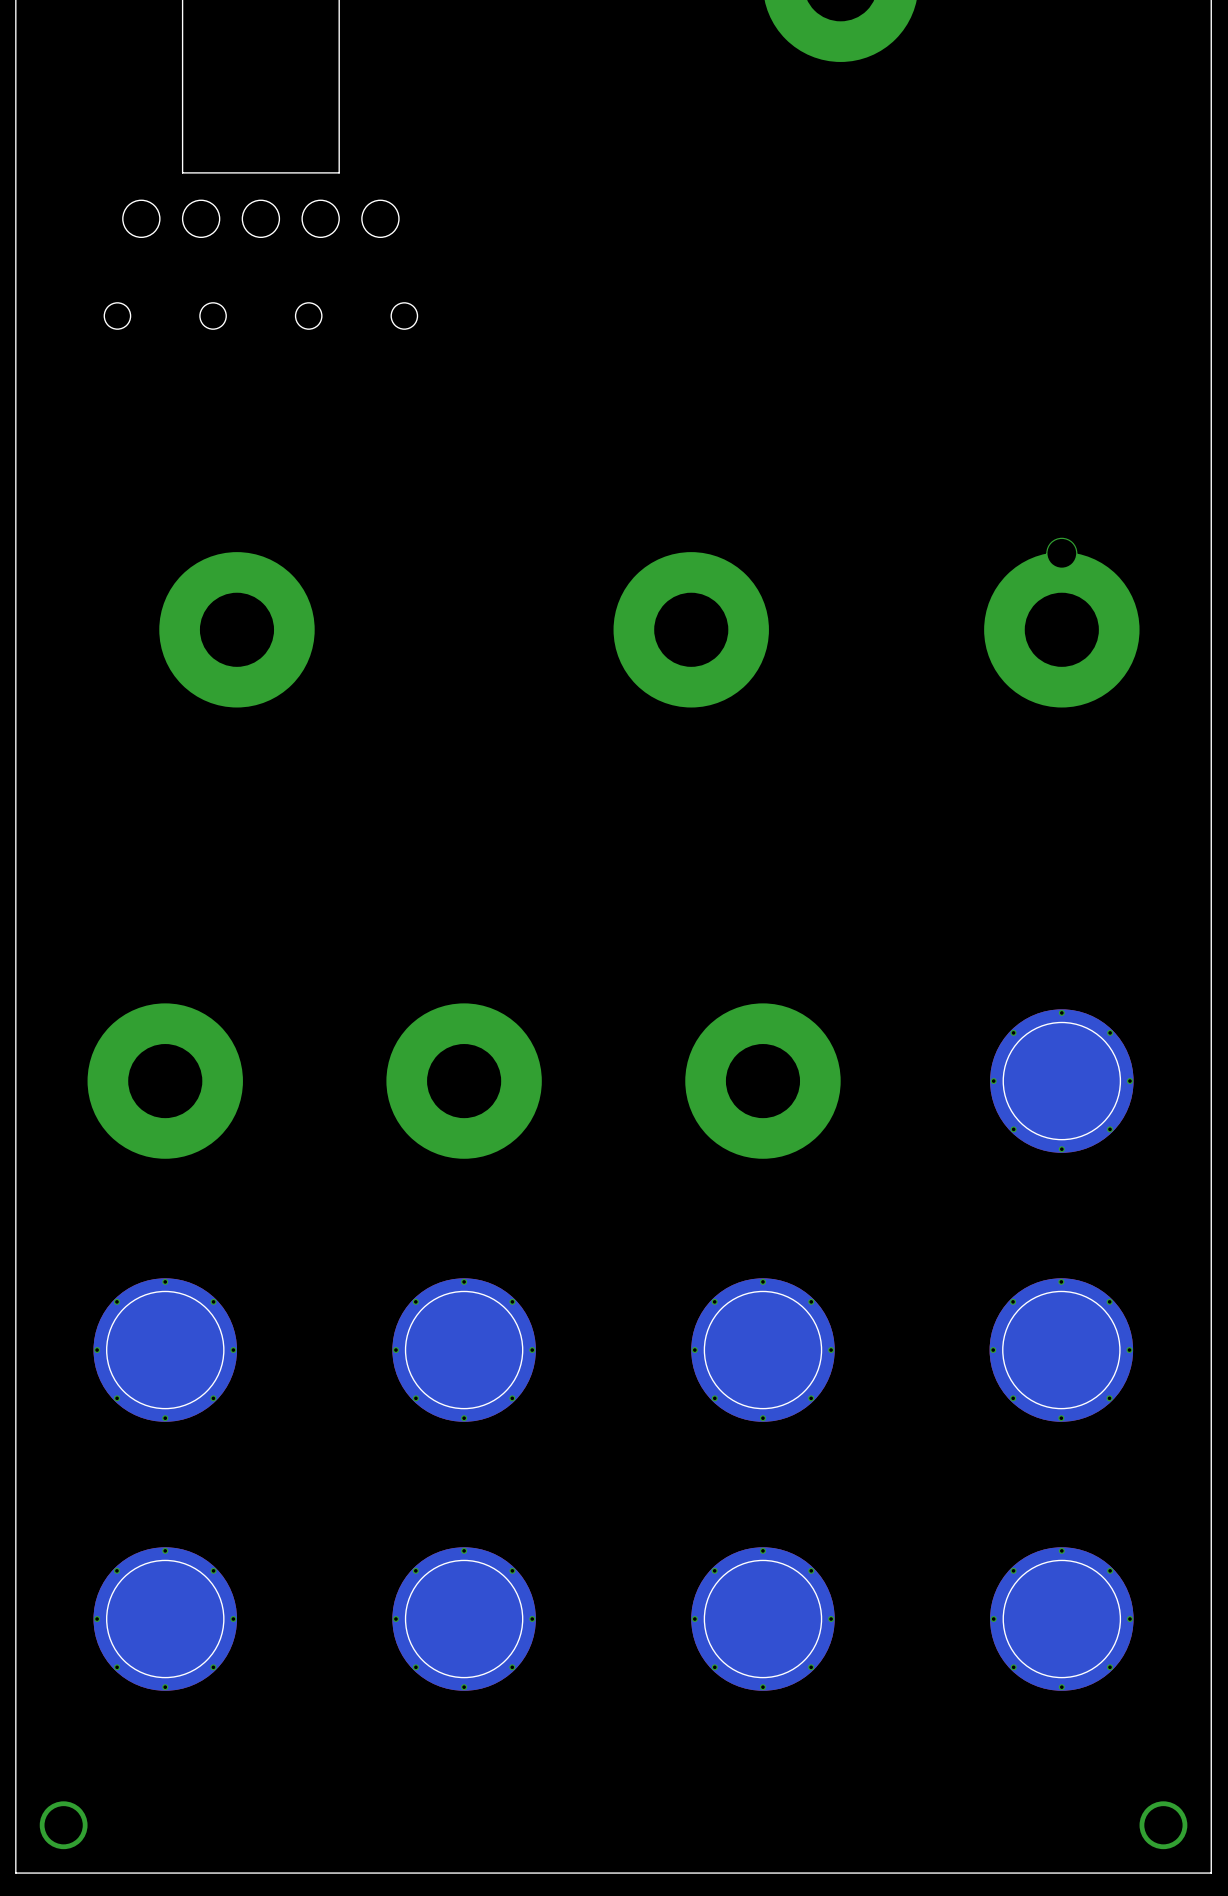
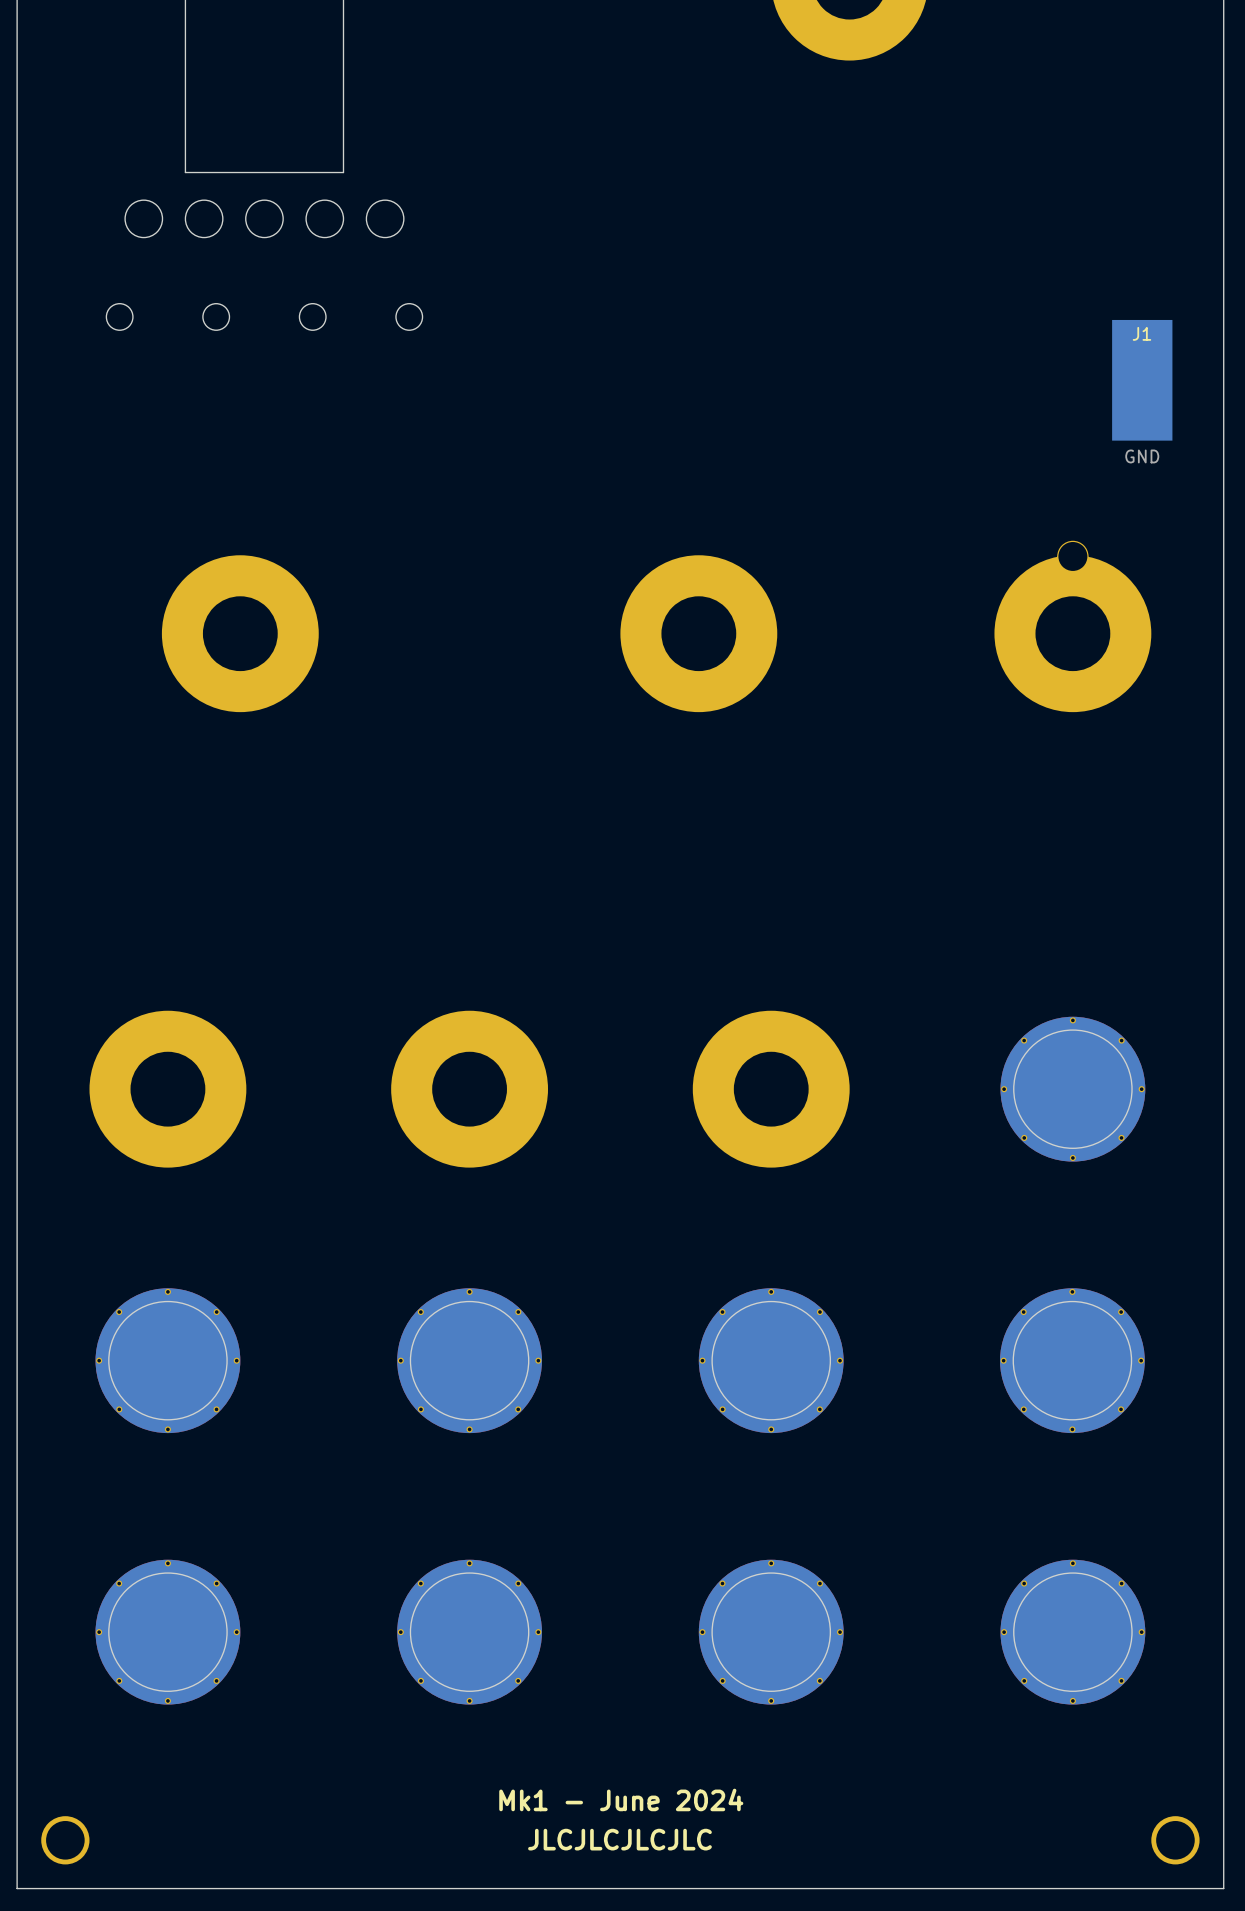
J1: none -> GND (1142, 380)
text: none -> Mk1 - June 2024 (621, 1799)
text: none -> JLCJLCJLCJLC (619, 1839)

